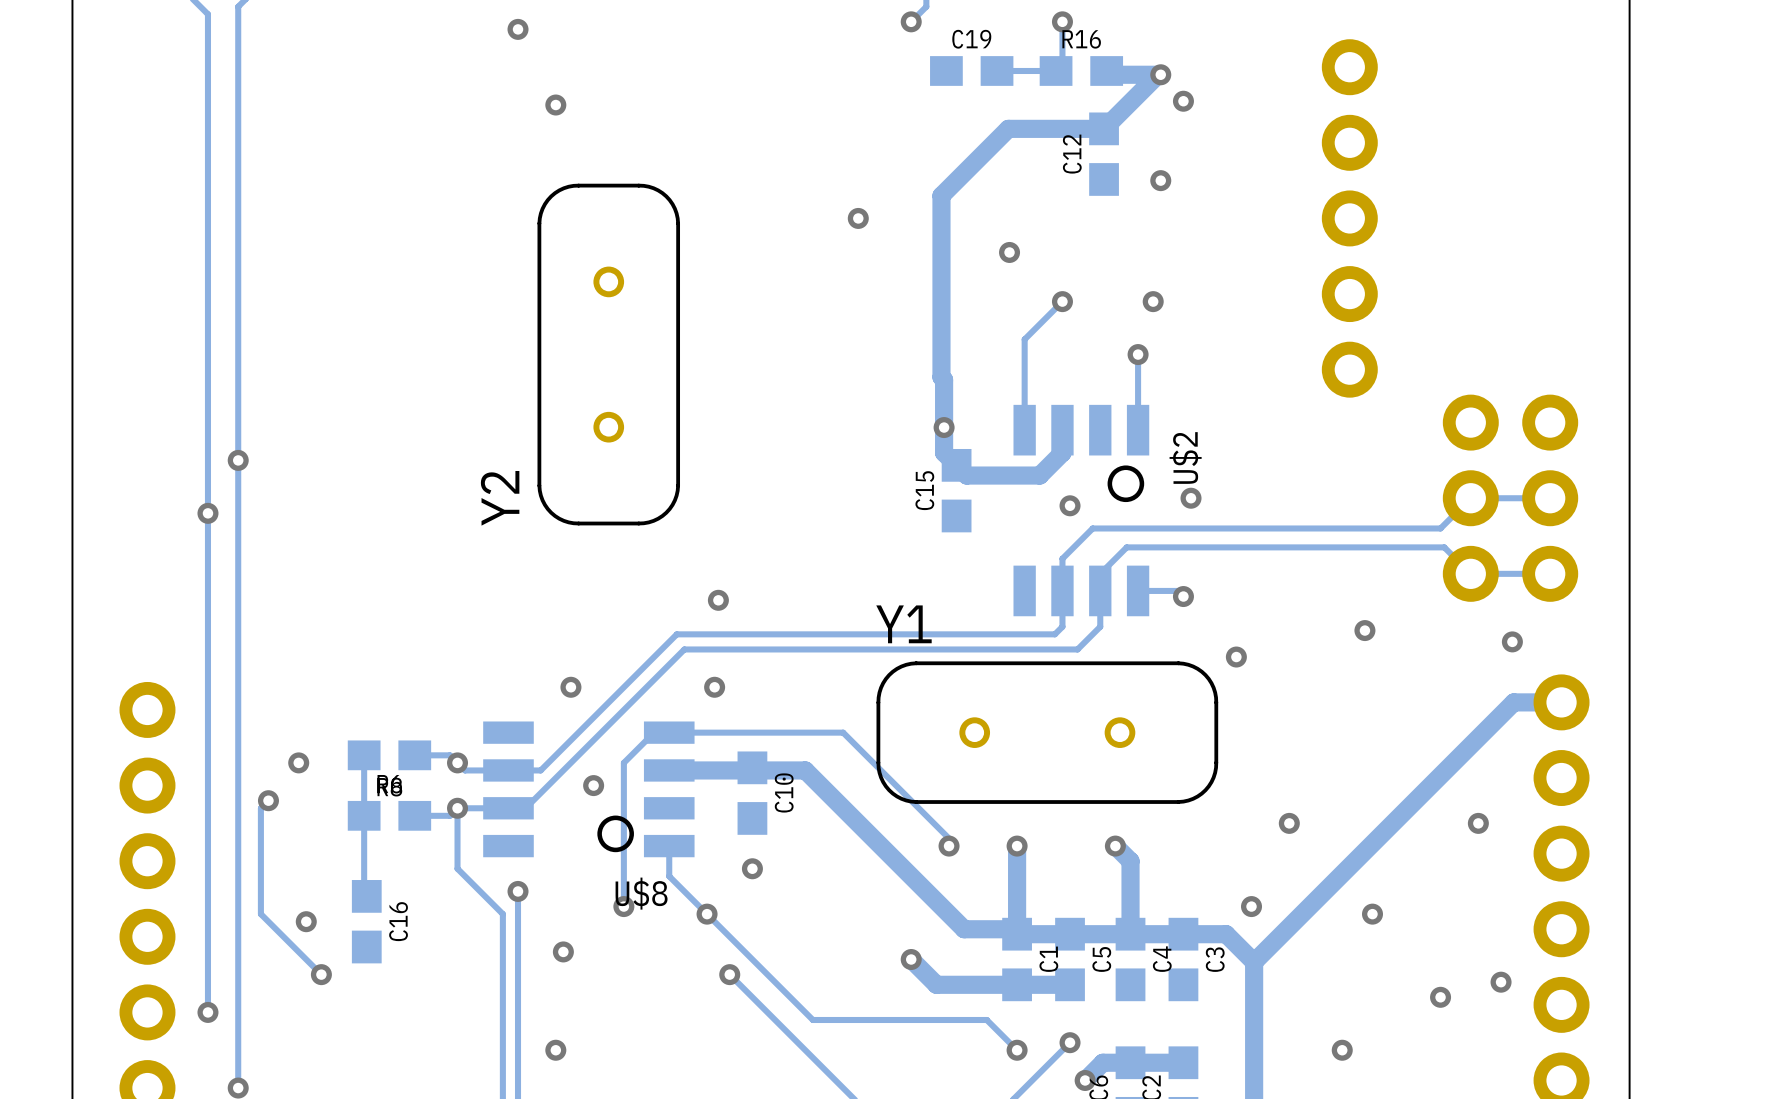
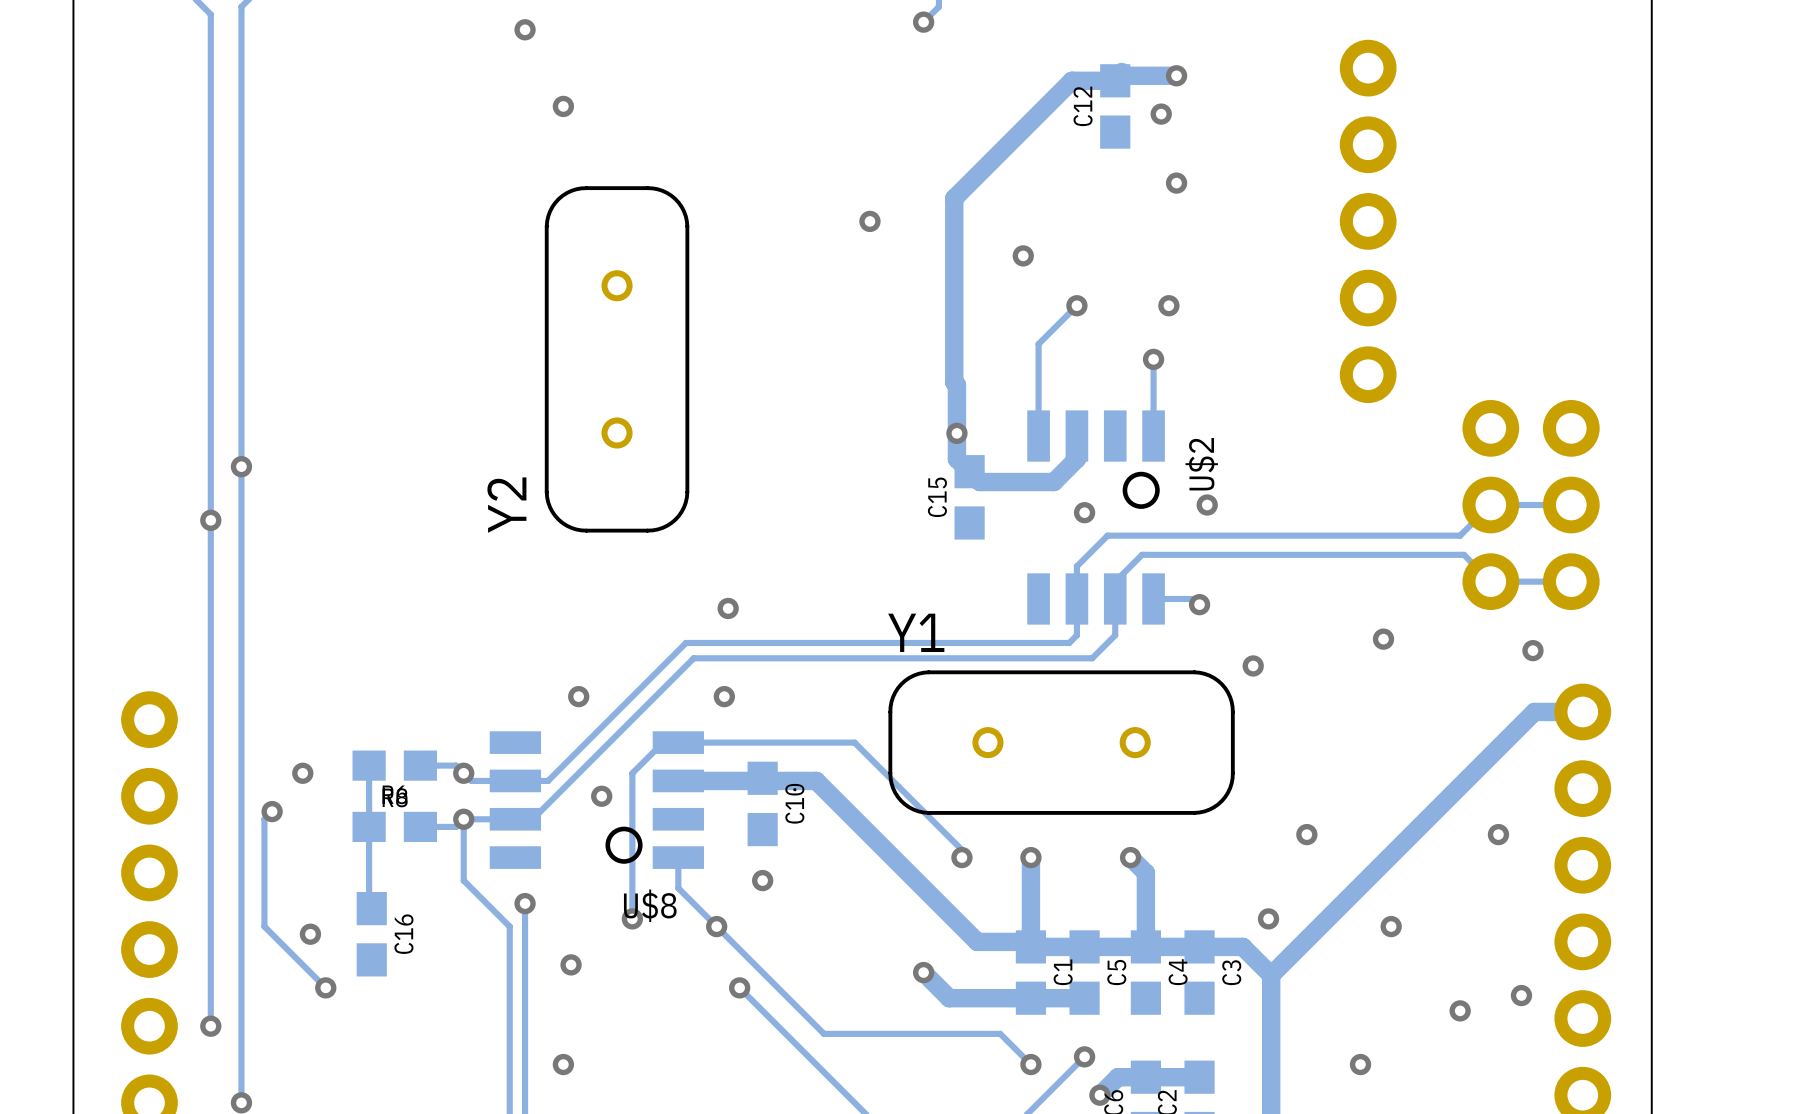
track: (1062, 21) (1062, 64) (1056, 70) (997, 70) -> none
via: (1062, 21) -> none
C19: (971, 70) -> none
R16: (1081, 70) -> none
track: (1158, 74) (1104, 128) (1008, 128) -> (1125, 75) (1120, 75) (1115, 80) (1071, 80) (1022, 130)
via position: (1183, 101) -> (1161, 114)
C12 position: (1104, 154) -> (1115, 106)

